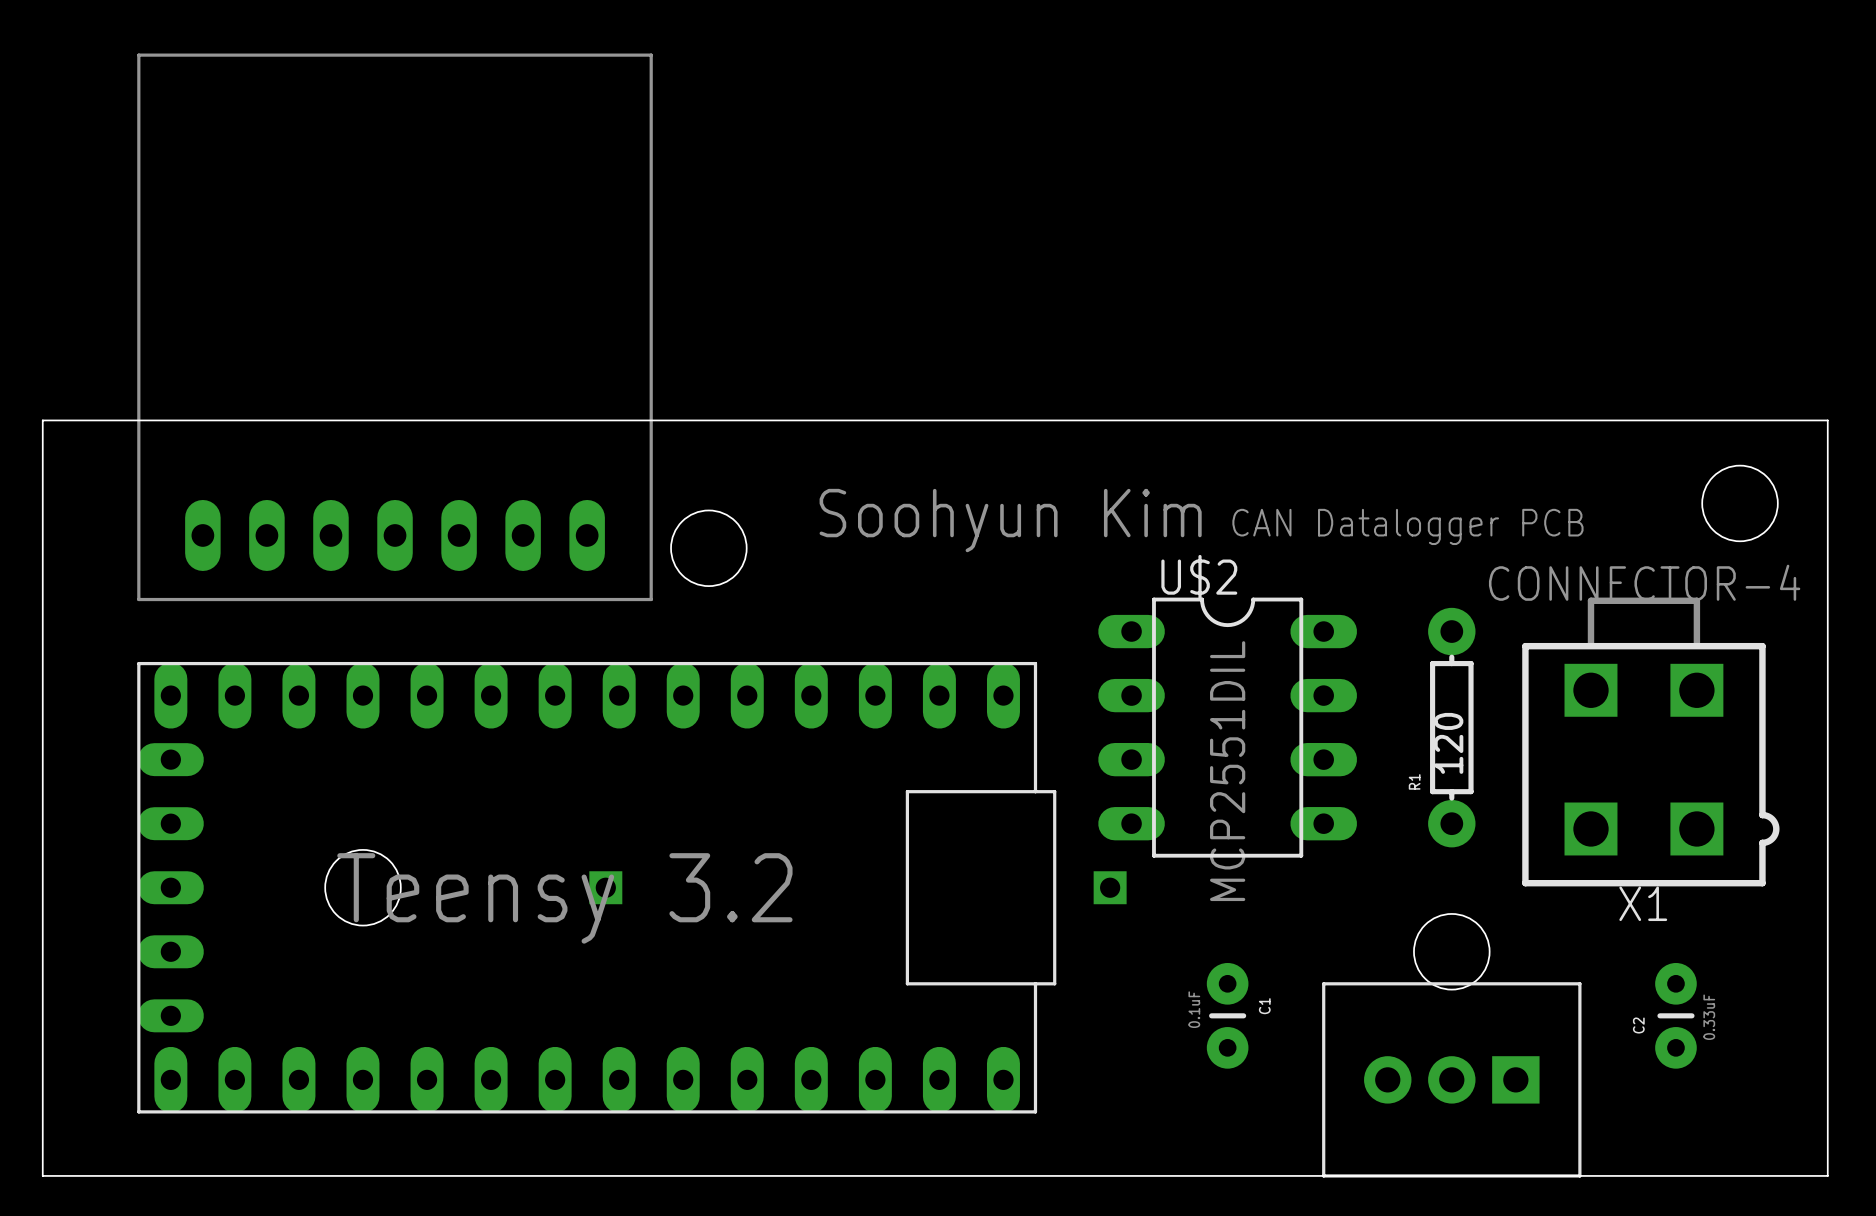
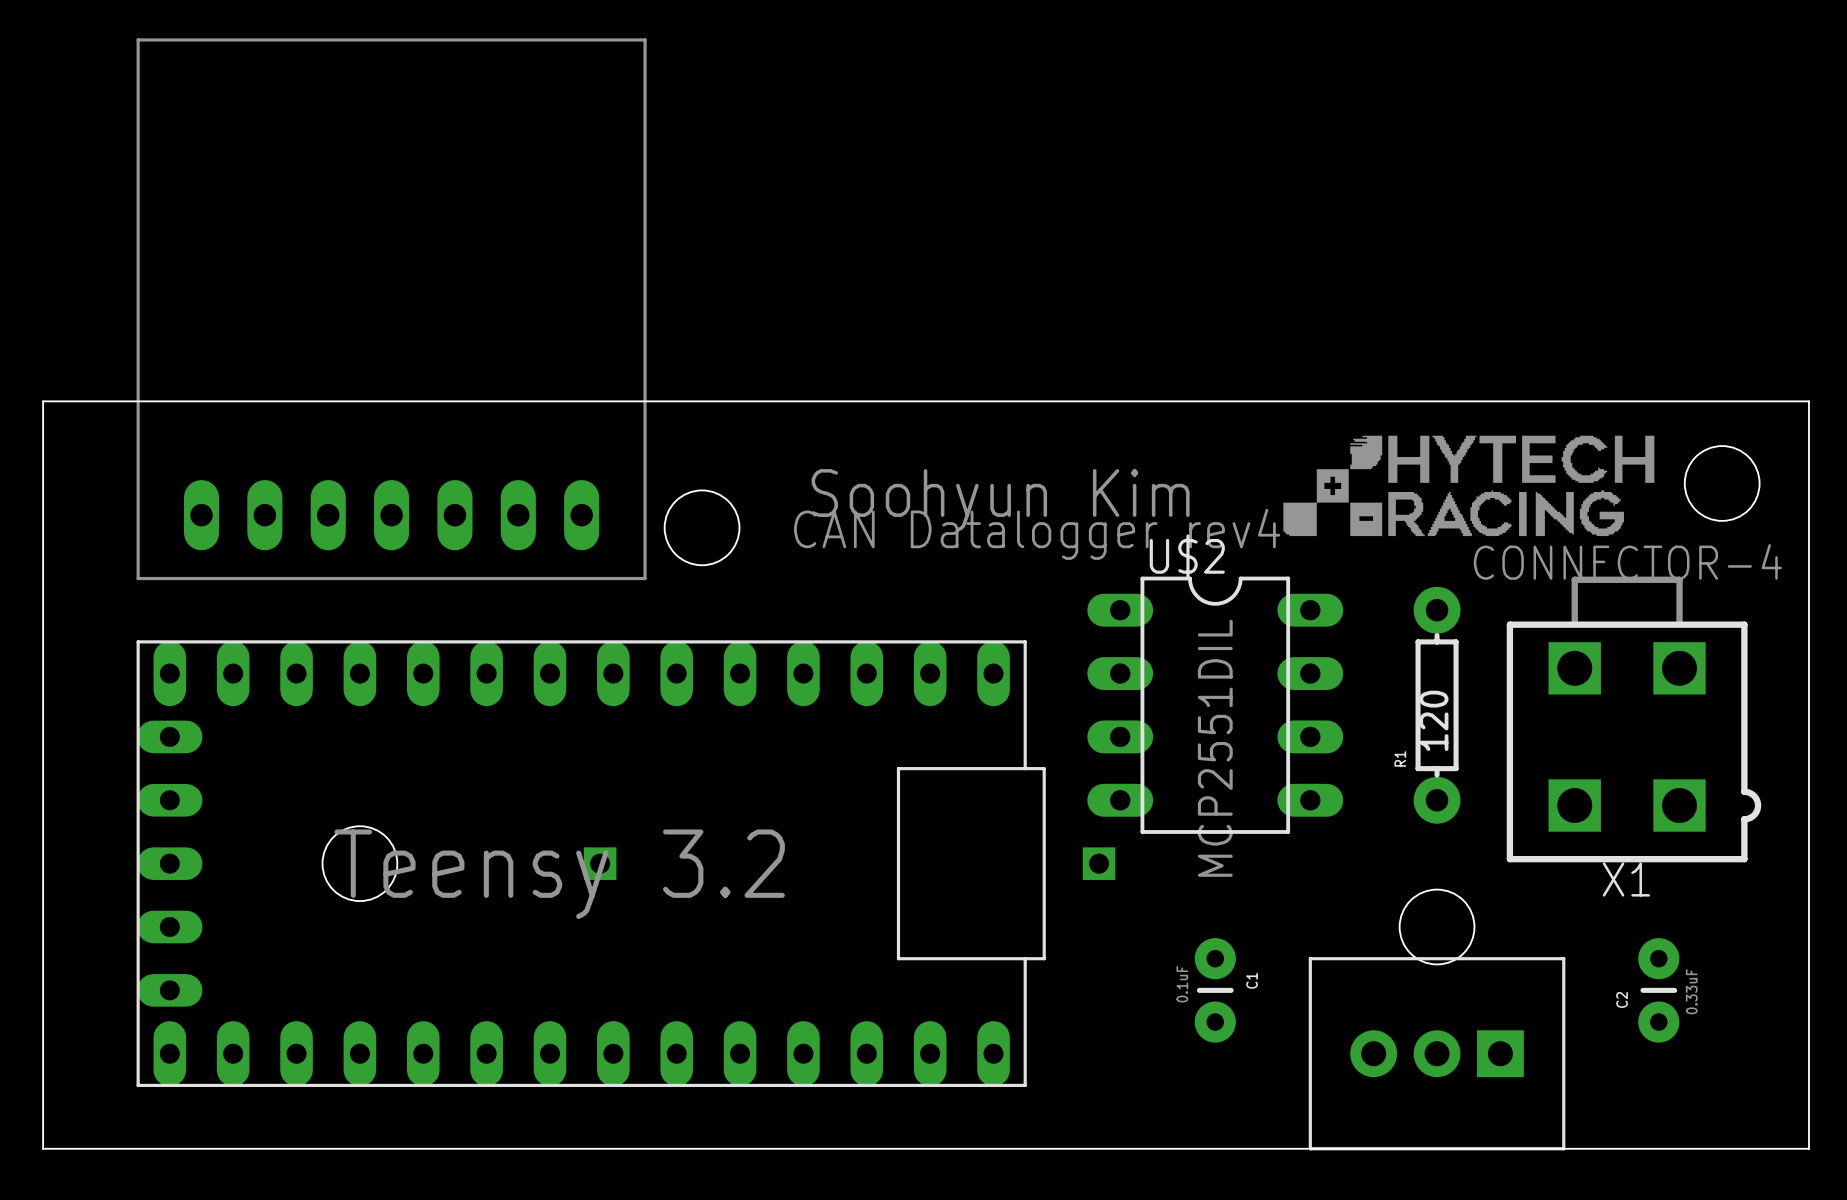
drawing: none -> [1283, 435, 1655, 537]
text: CAN Datalogger PCB (1407, 526) -> CAN Datalogger rev4 (1037, 534)

